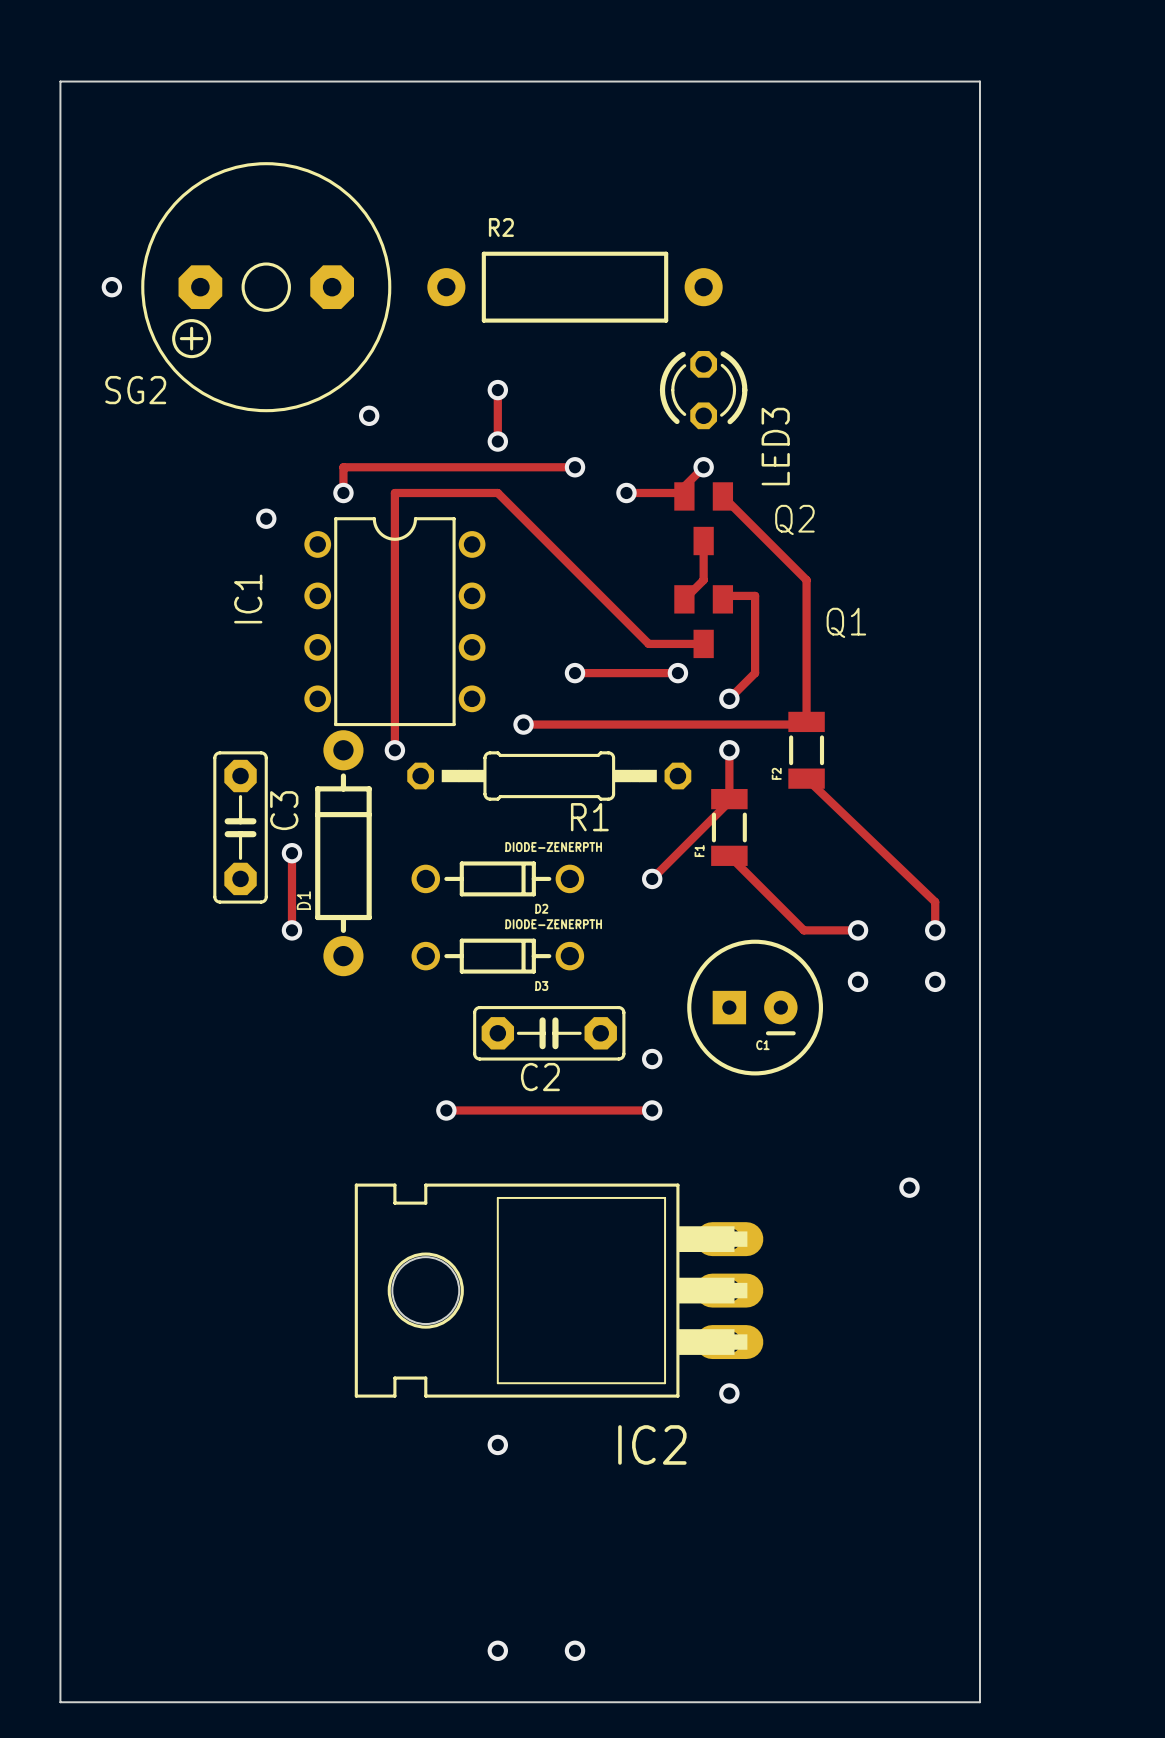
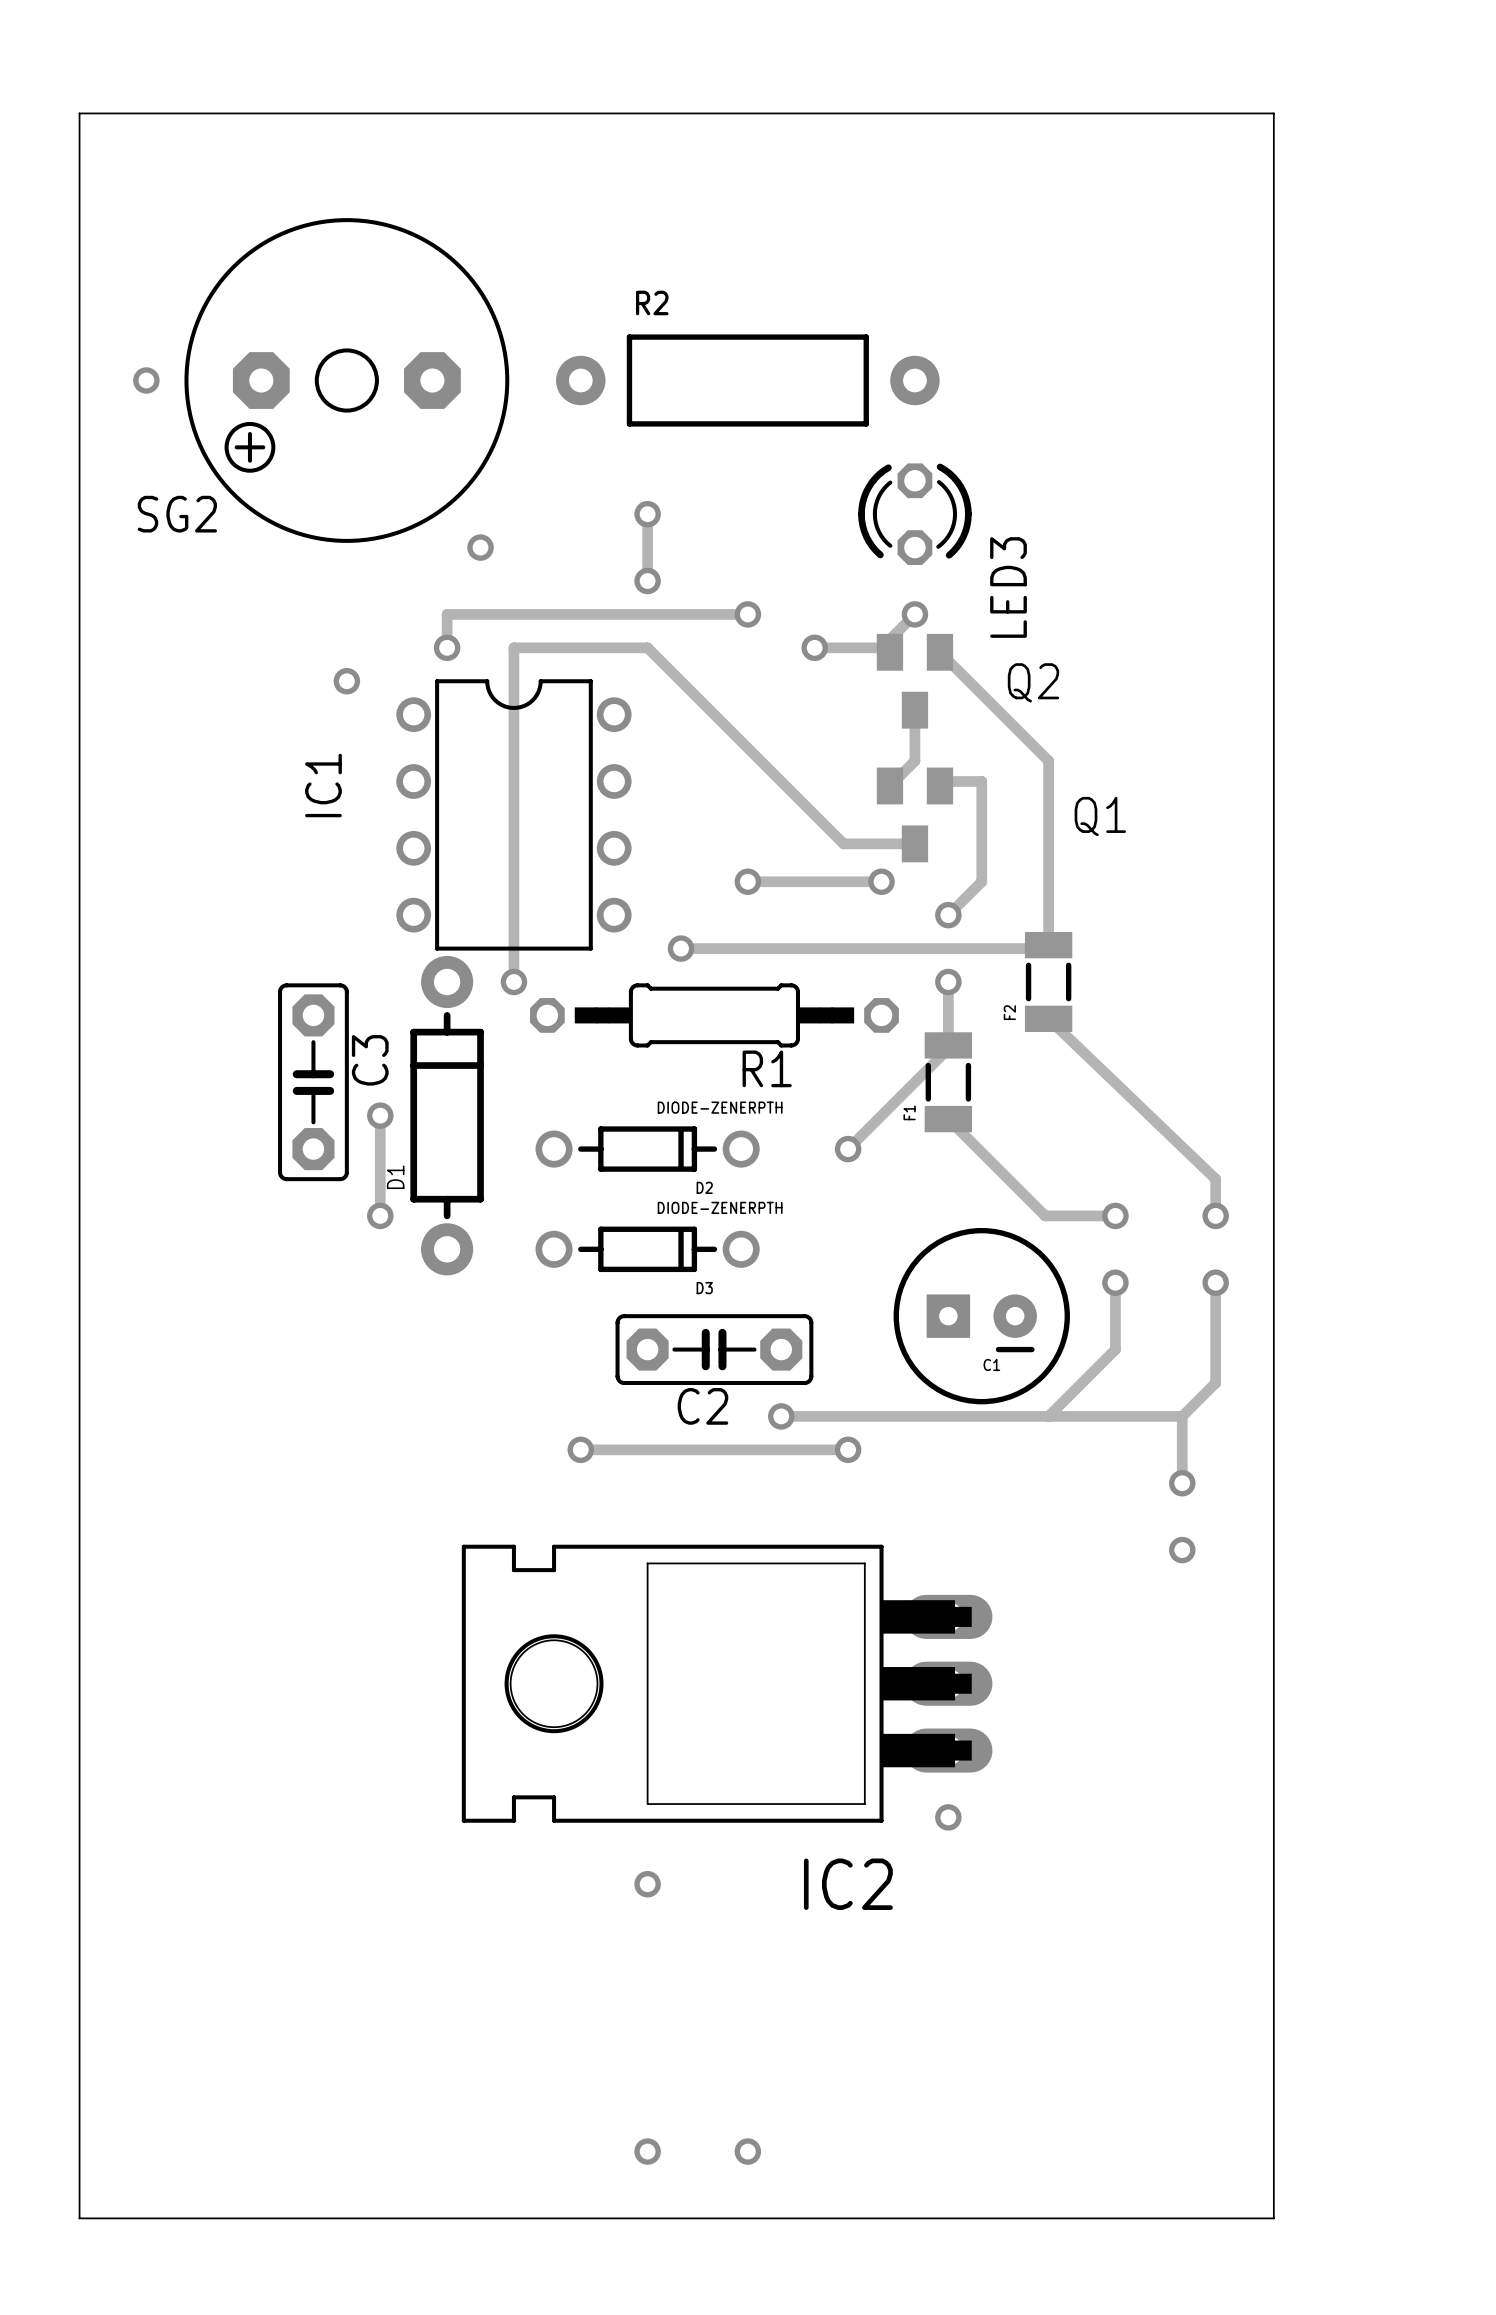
track: none -> (1115, 1282) (1115, 1349) (1048, 1416)
track: none -> (1215, 1282) (1215, 1382) (1182, 1416)
via position: (652, 1059) -> (781, 1416)
track: none -> (781, 1416) (1182, 1416)
track: none -> (1182, 1416) (1182, 1483)
via: none -> (1182, 1483)

